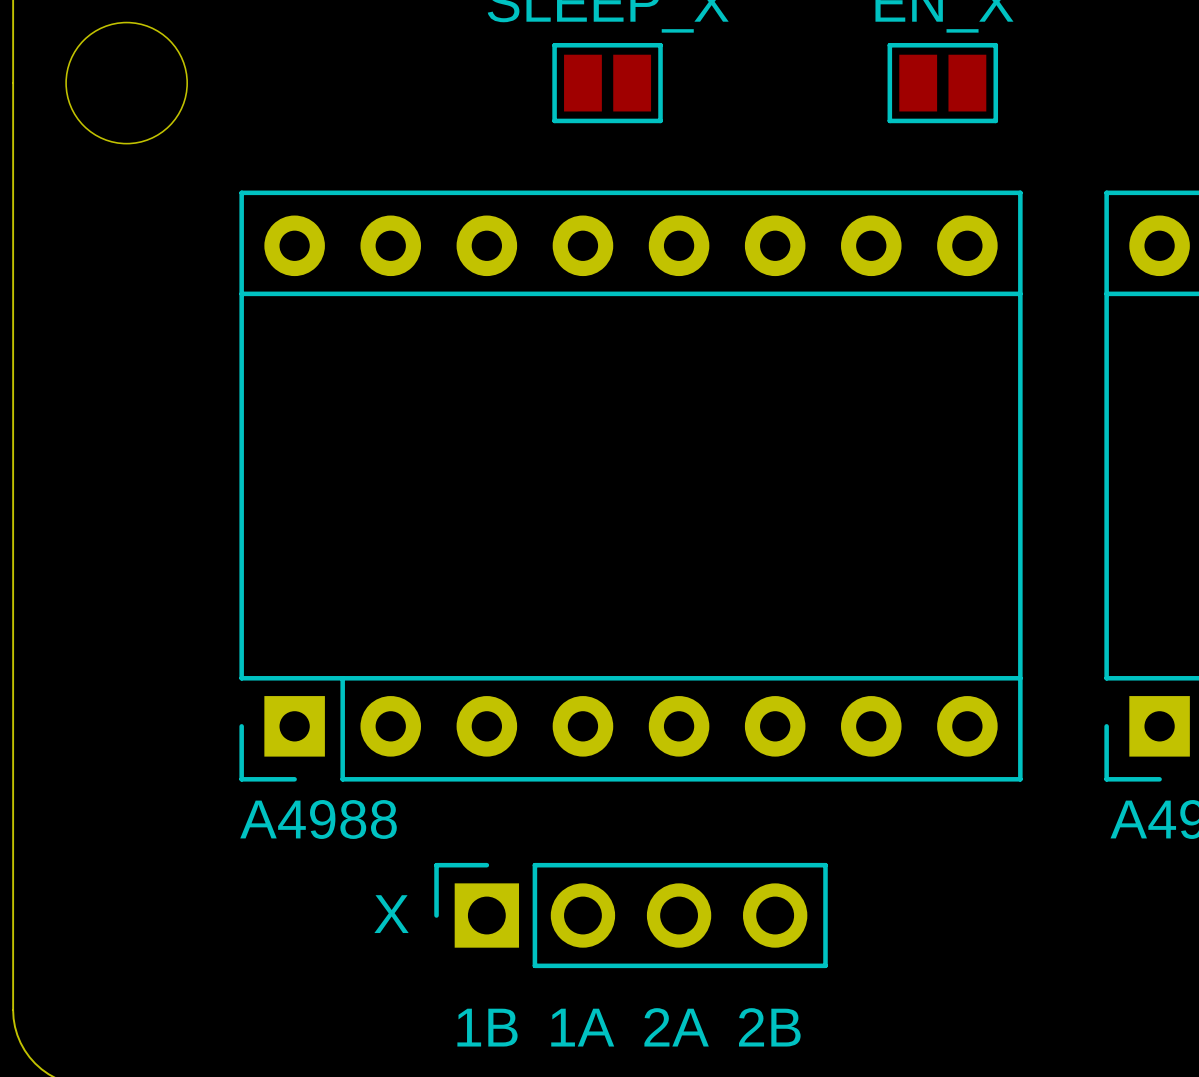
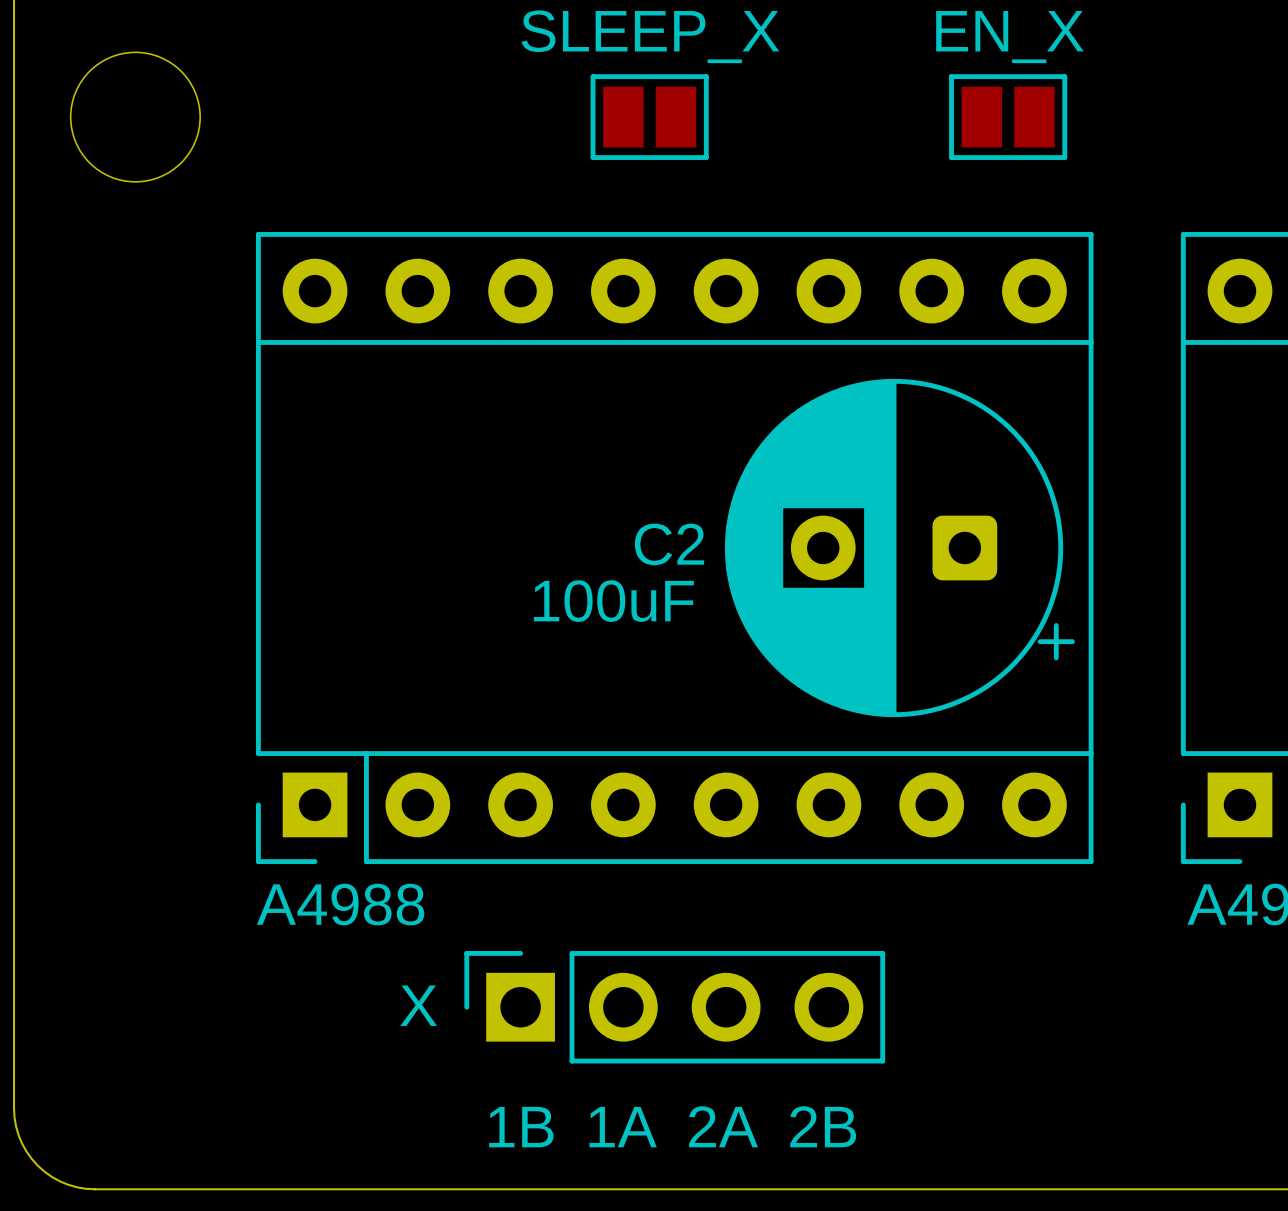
C2: none -> (899, 548)
text: none -> 100uF (613, 601)

